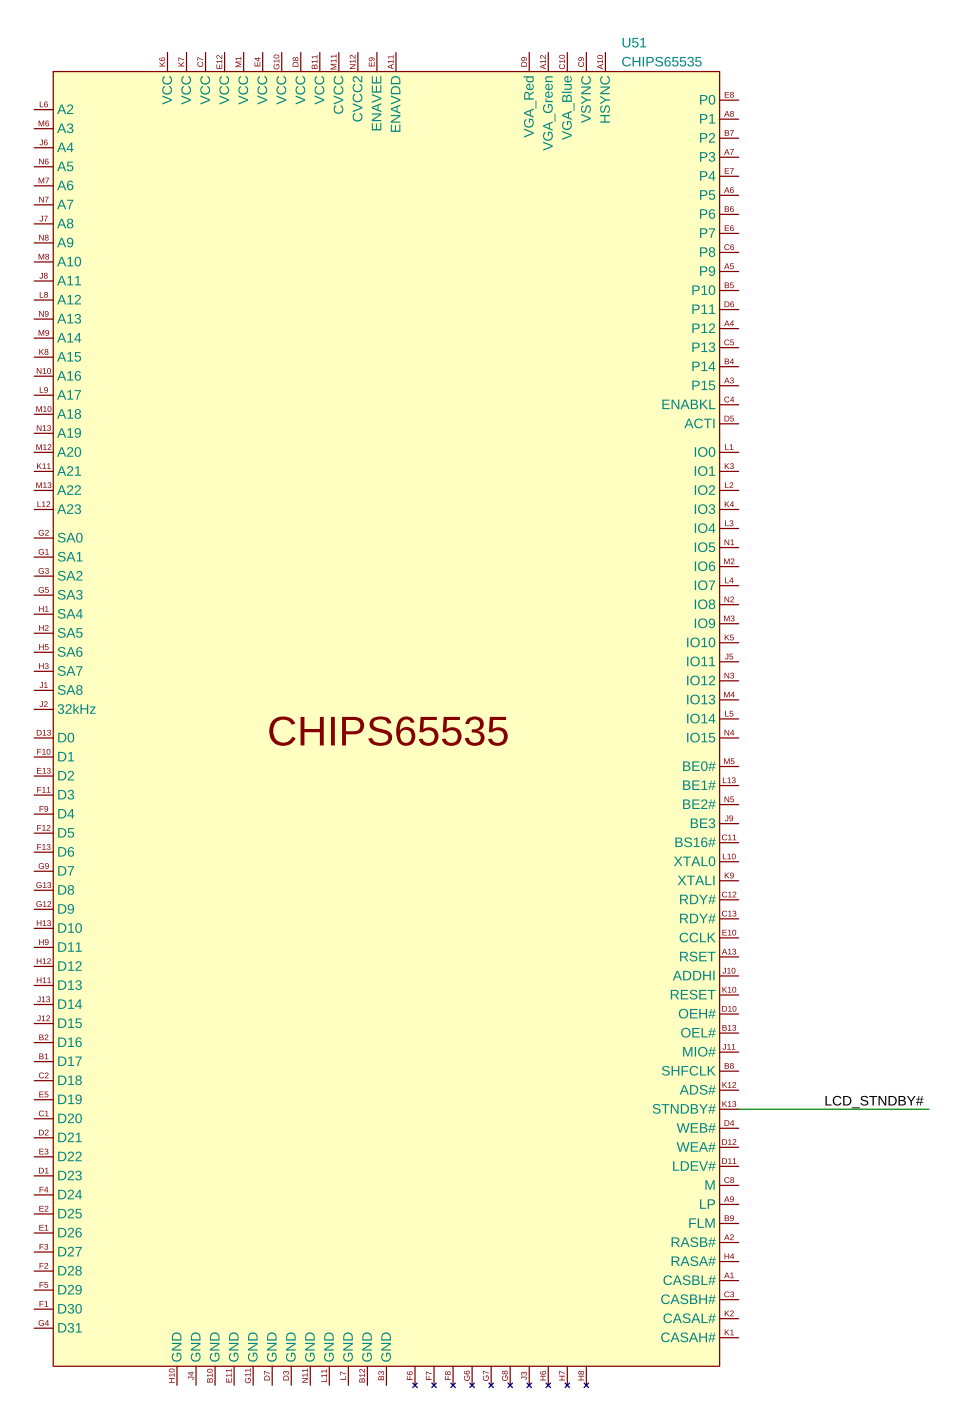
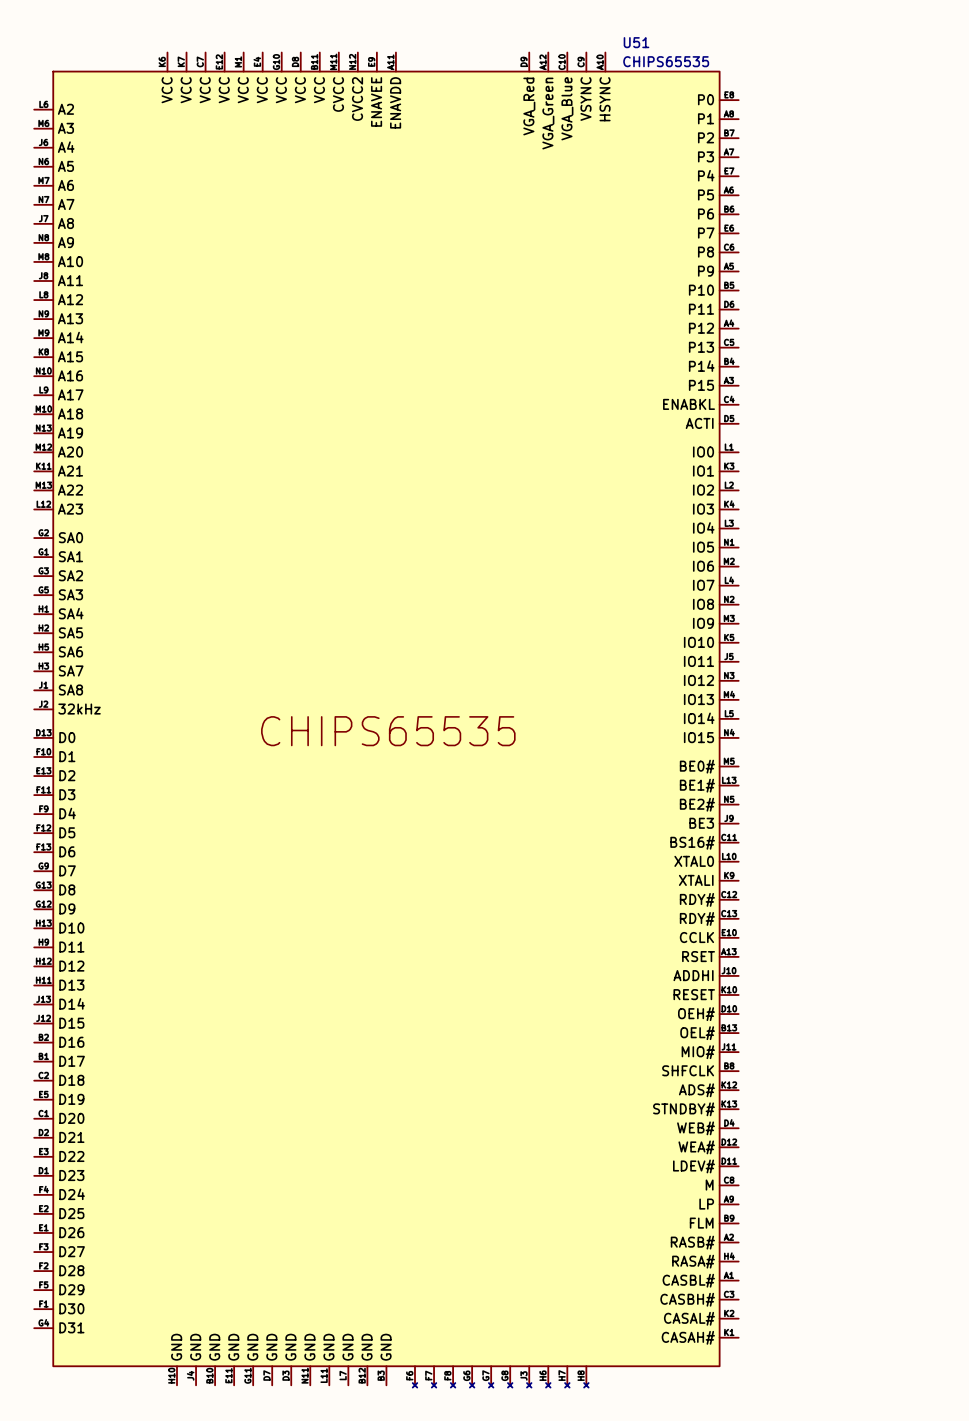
label: LCD_STNDBY# (874, 1102) -> none
wire: (738, 1109) (929, 1109) -> none

